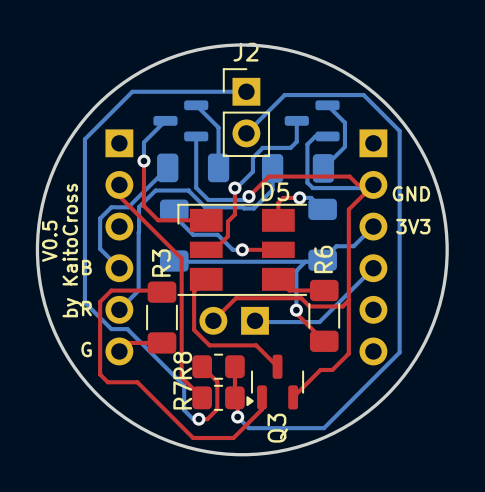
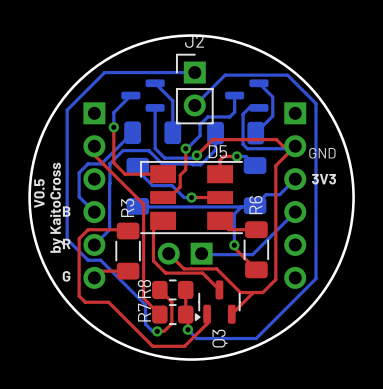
top track: (348, 300) (342, 306) (309, 306) (301, 298) (235, 298) (213, 320) -> (253, 292) (240, 292) (216, 268) (183, 268) (168, 253)

